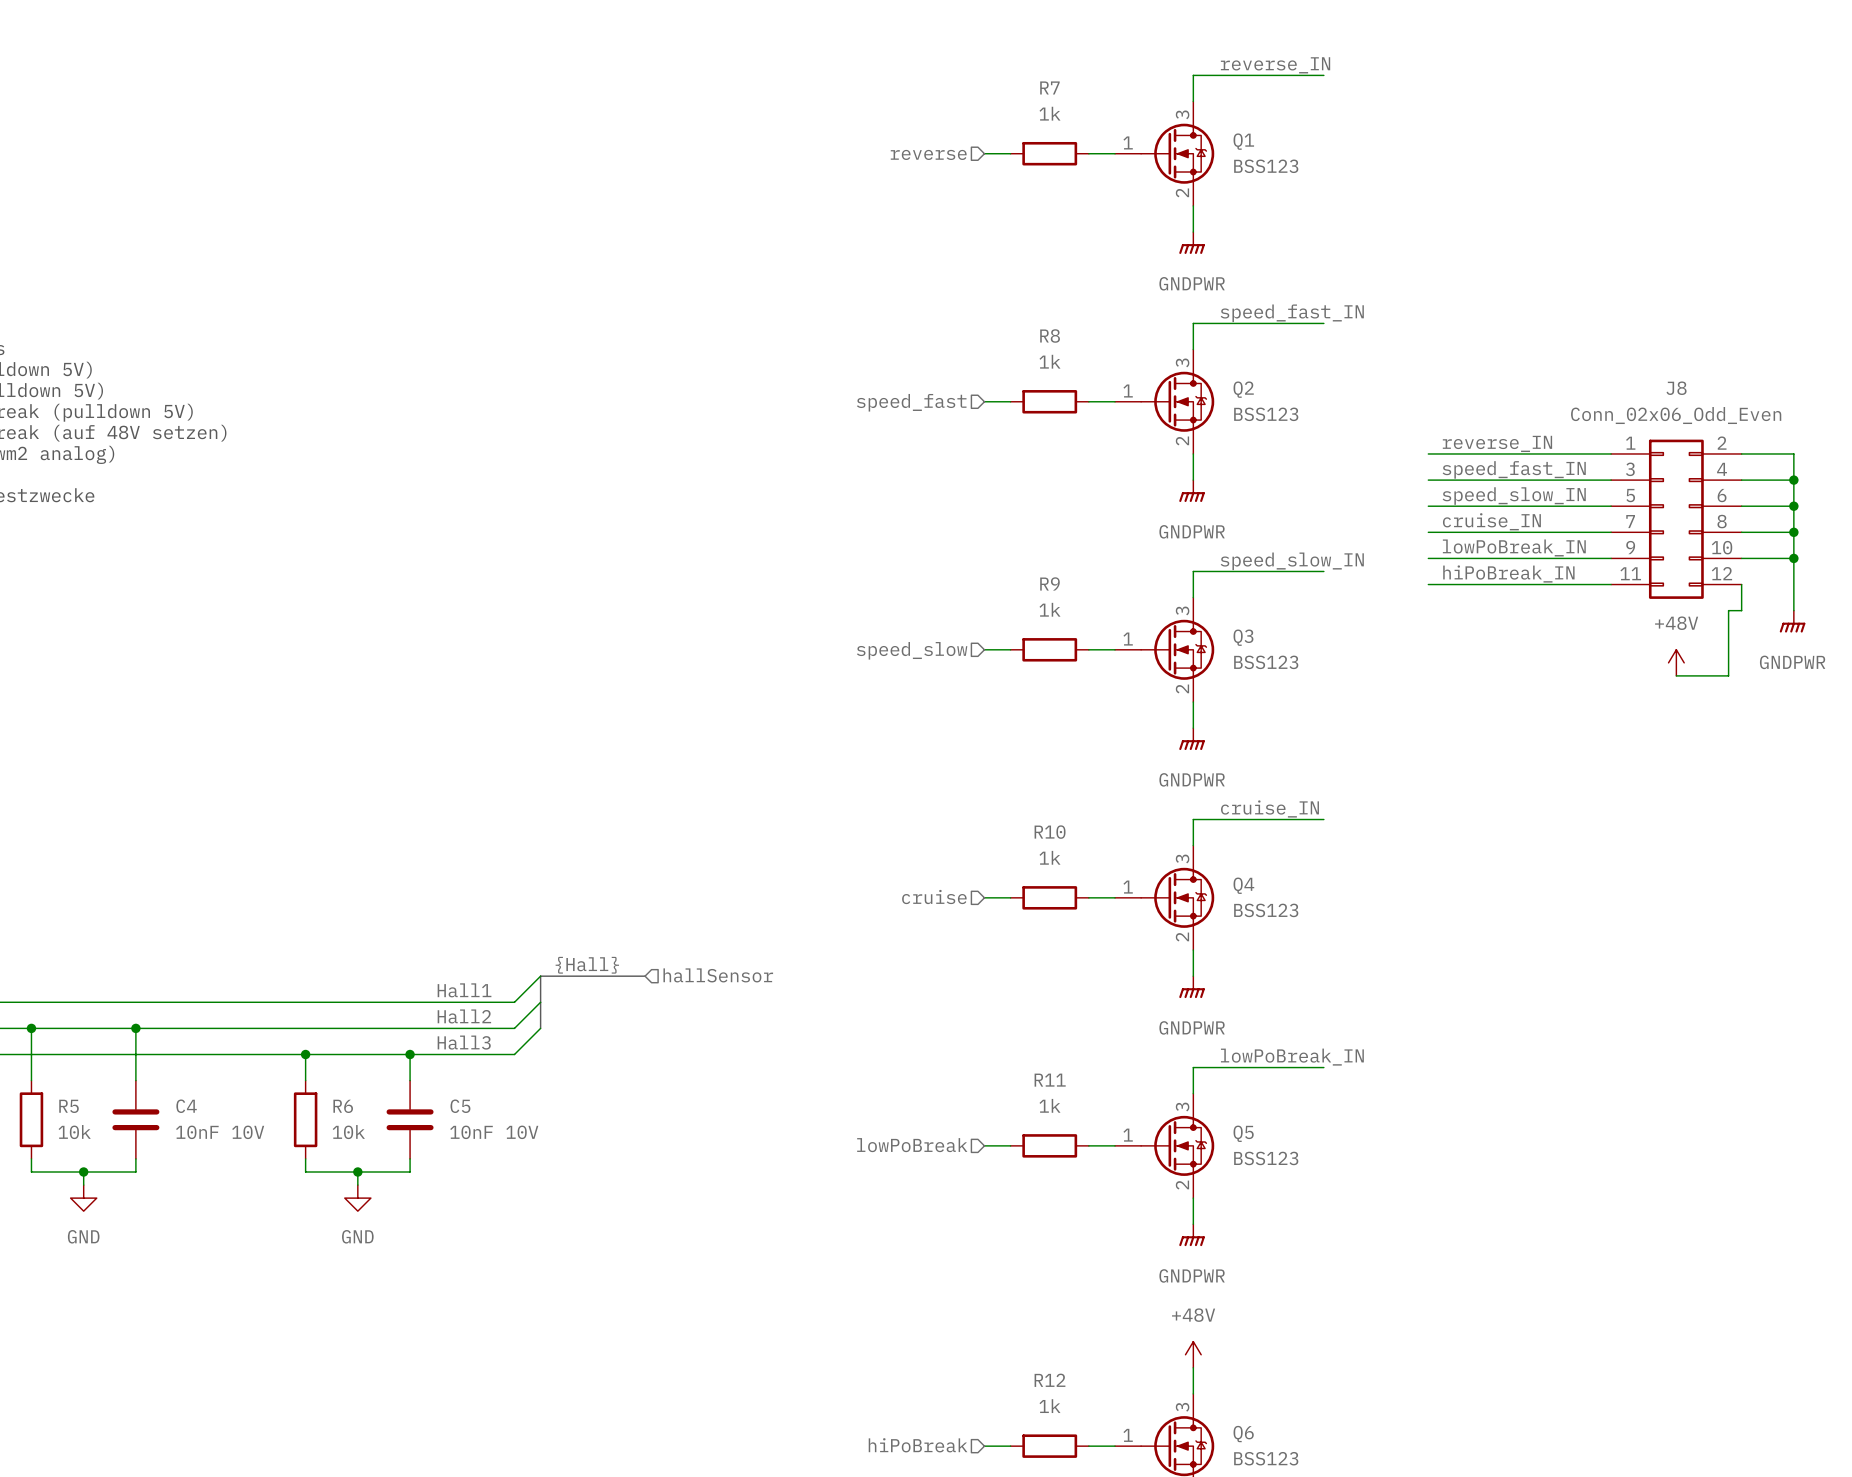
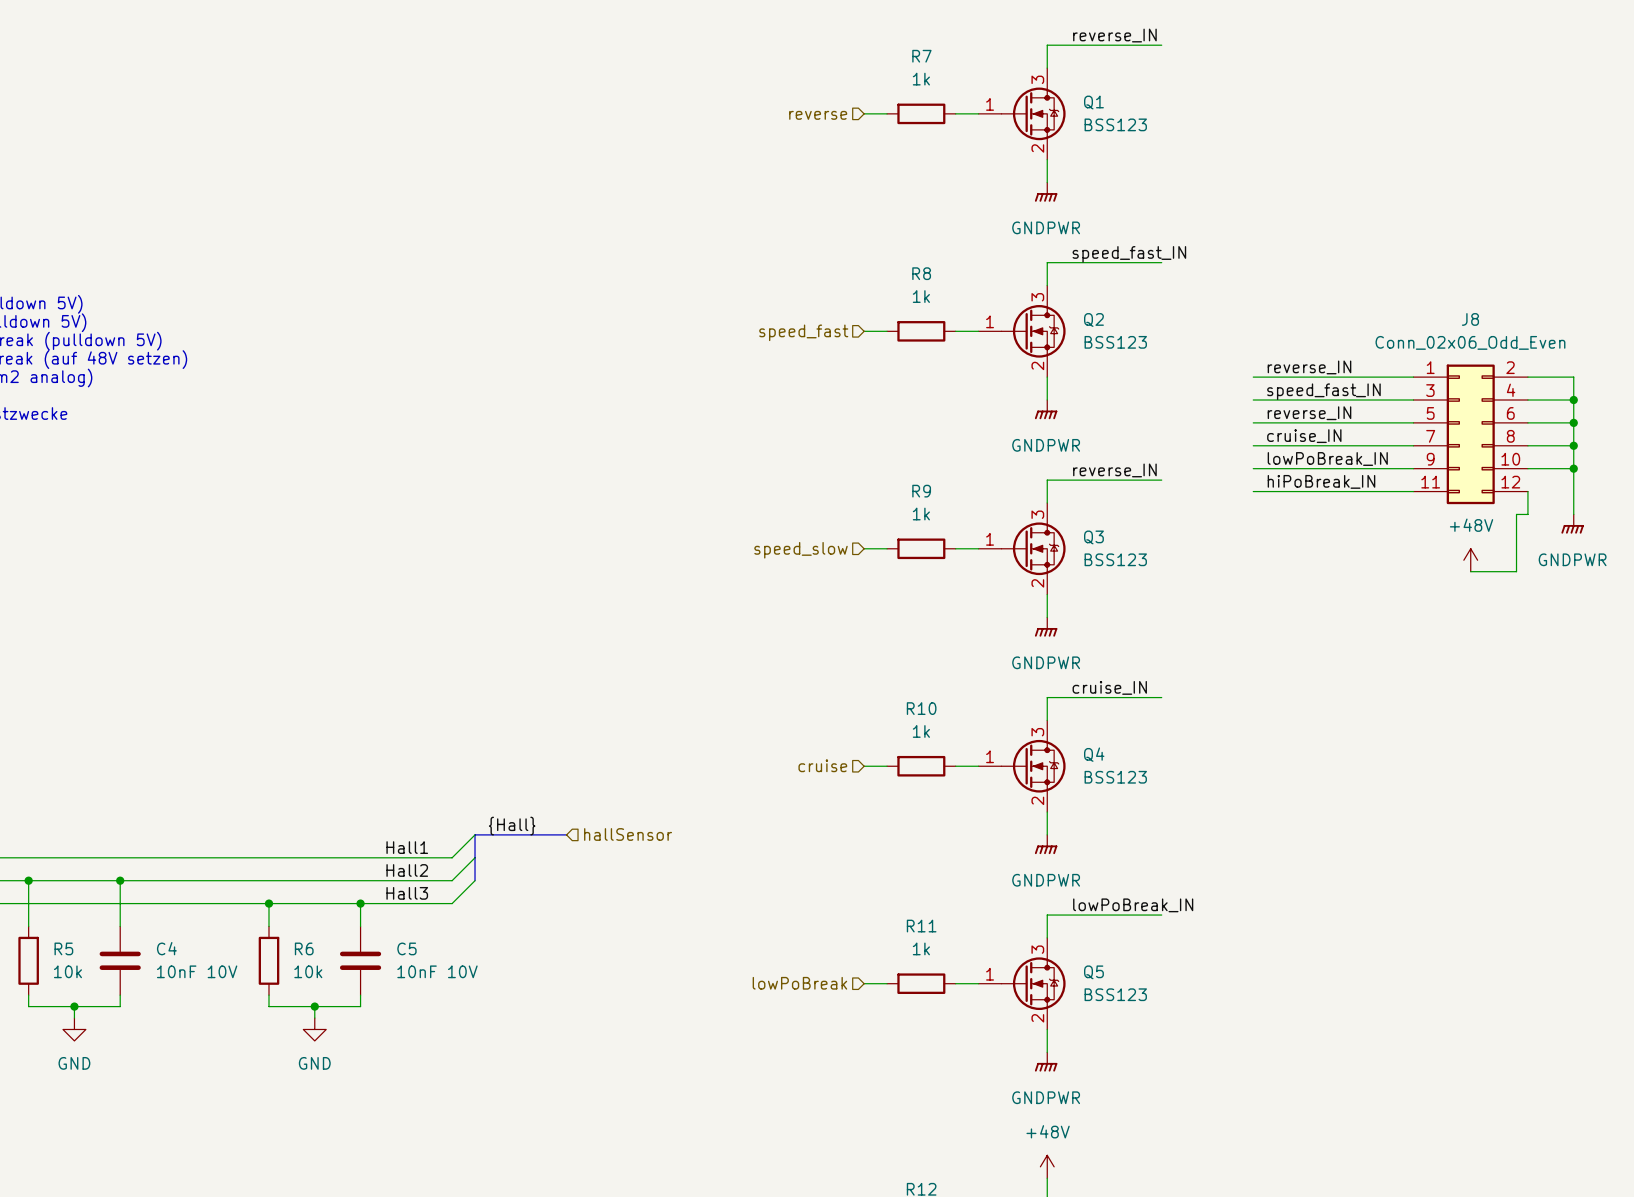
label: speed_slow_IN (1514, 496) -> reverse_IN (1309, 413)
label: speed_slow_IN (1292, 561) -> reverse_IN (1114, 470)

